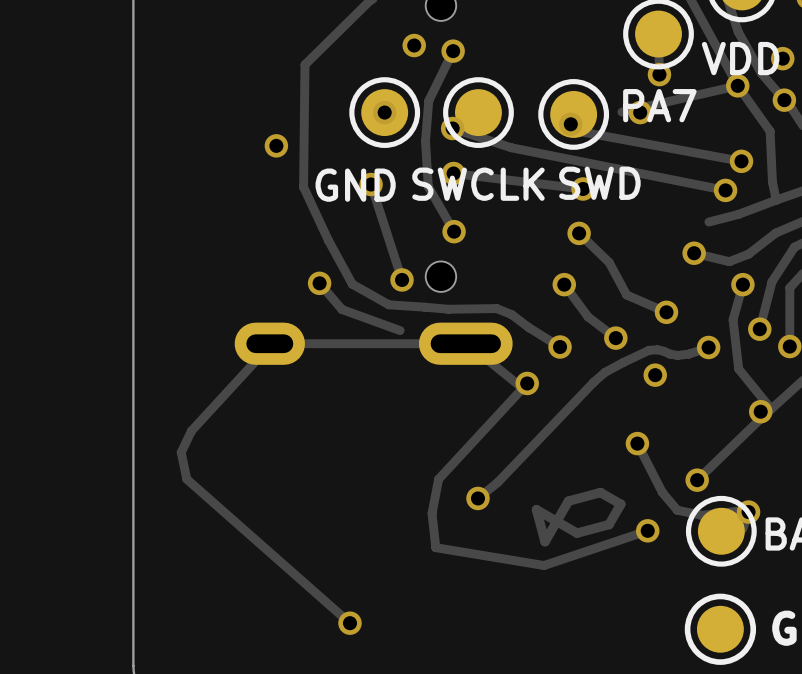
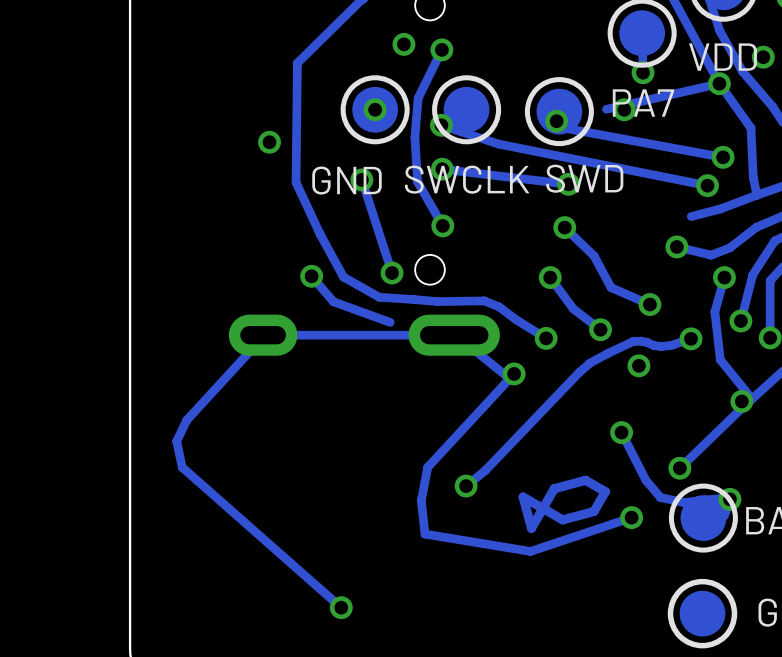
via: (784, 100) -> none

